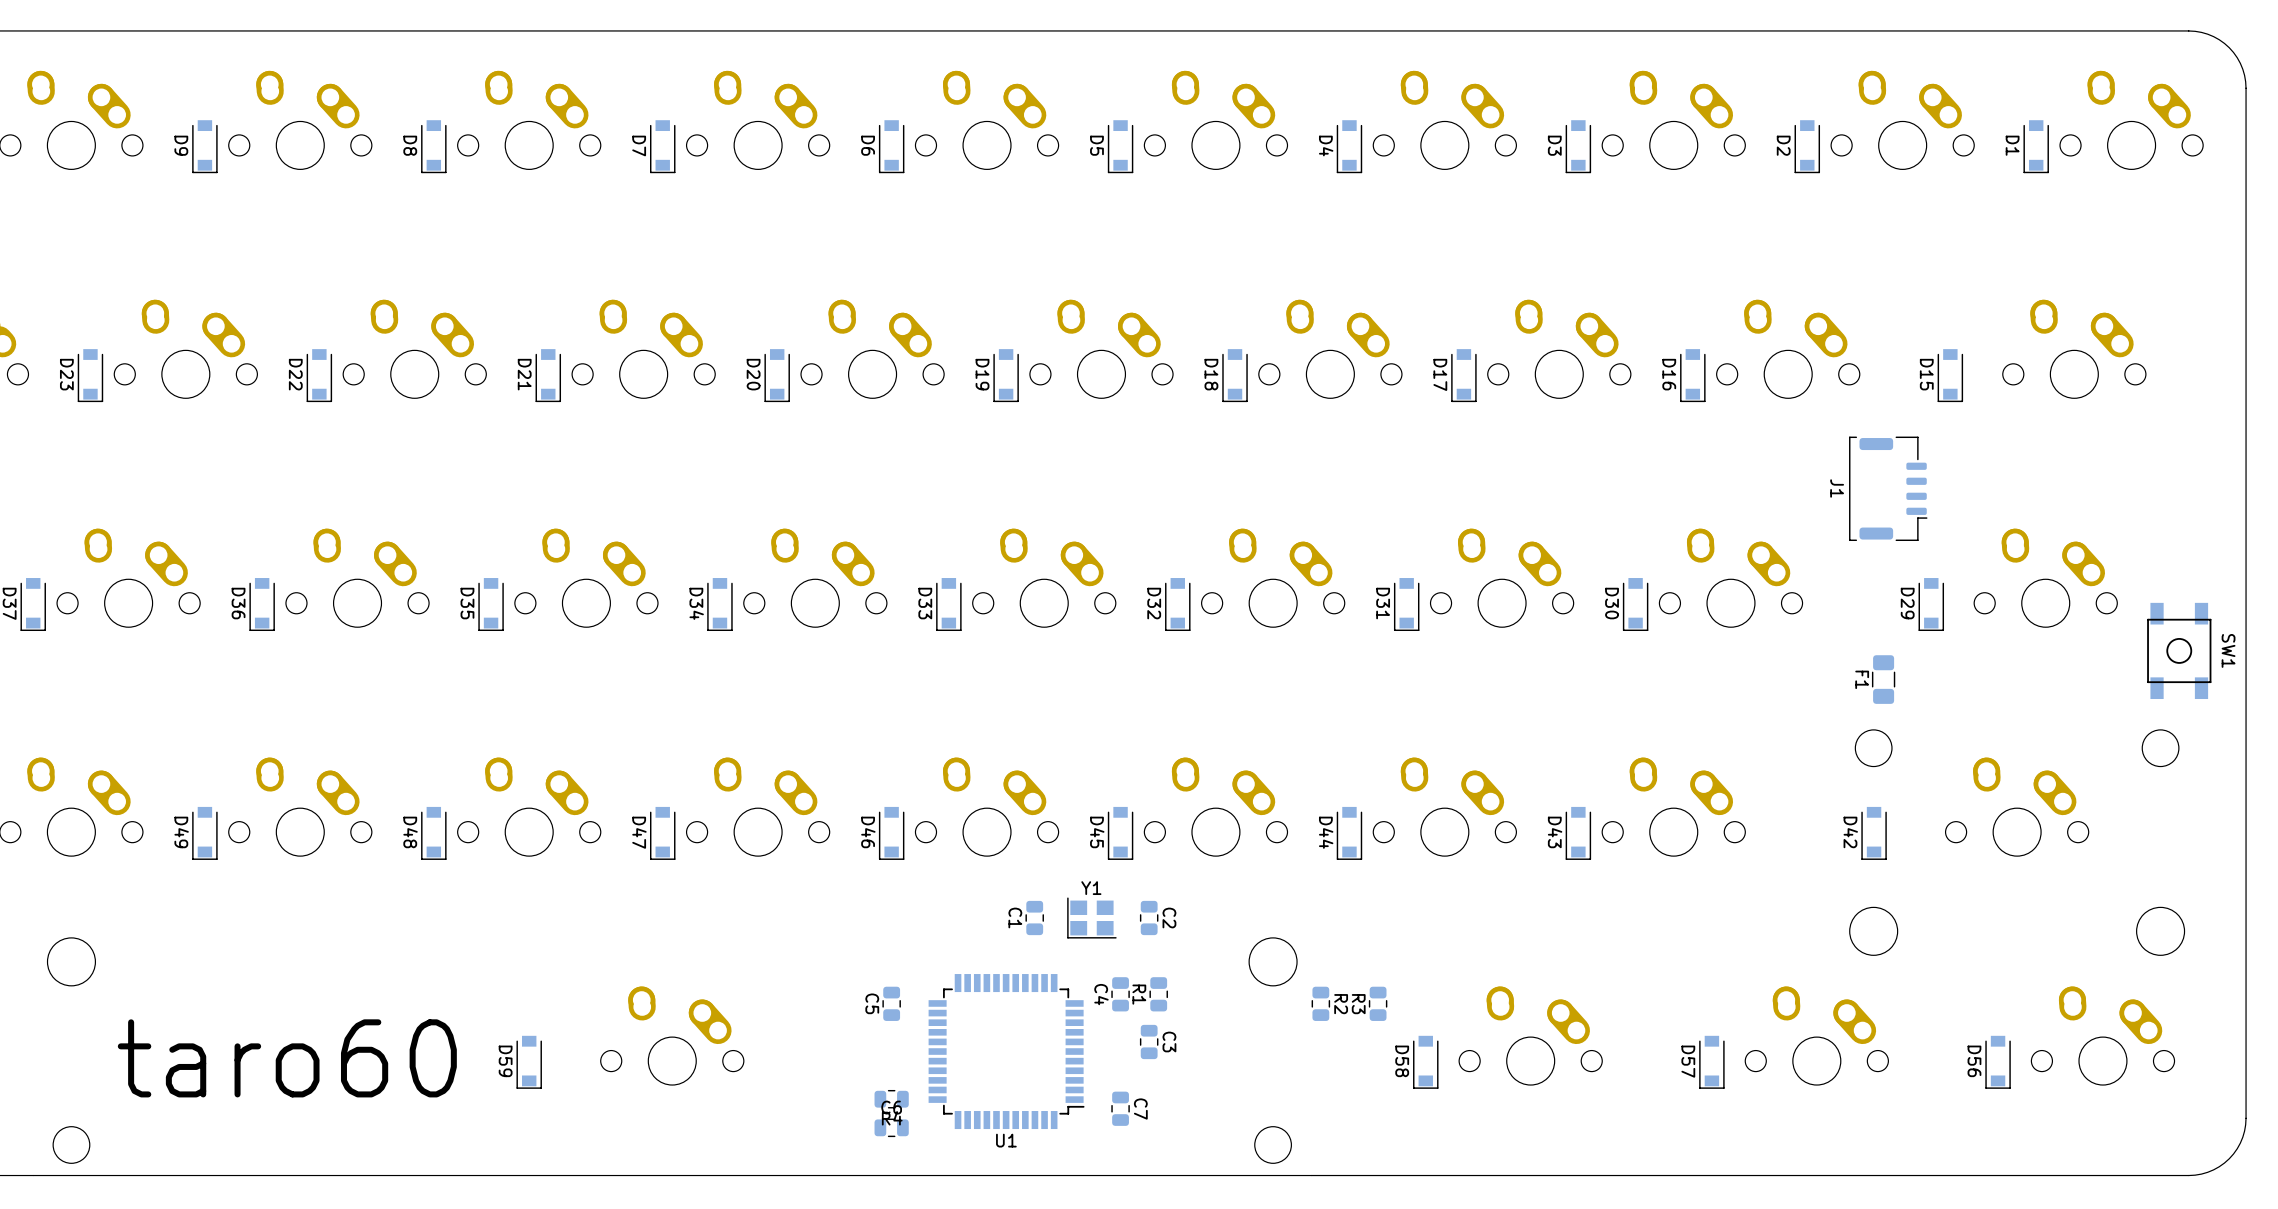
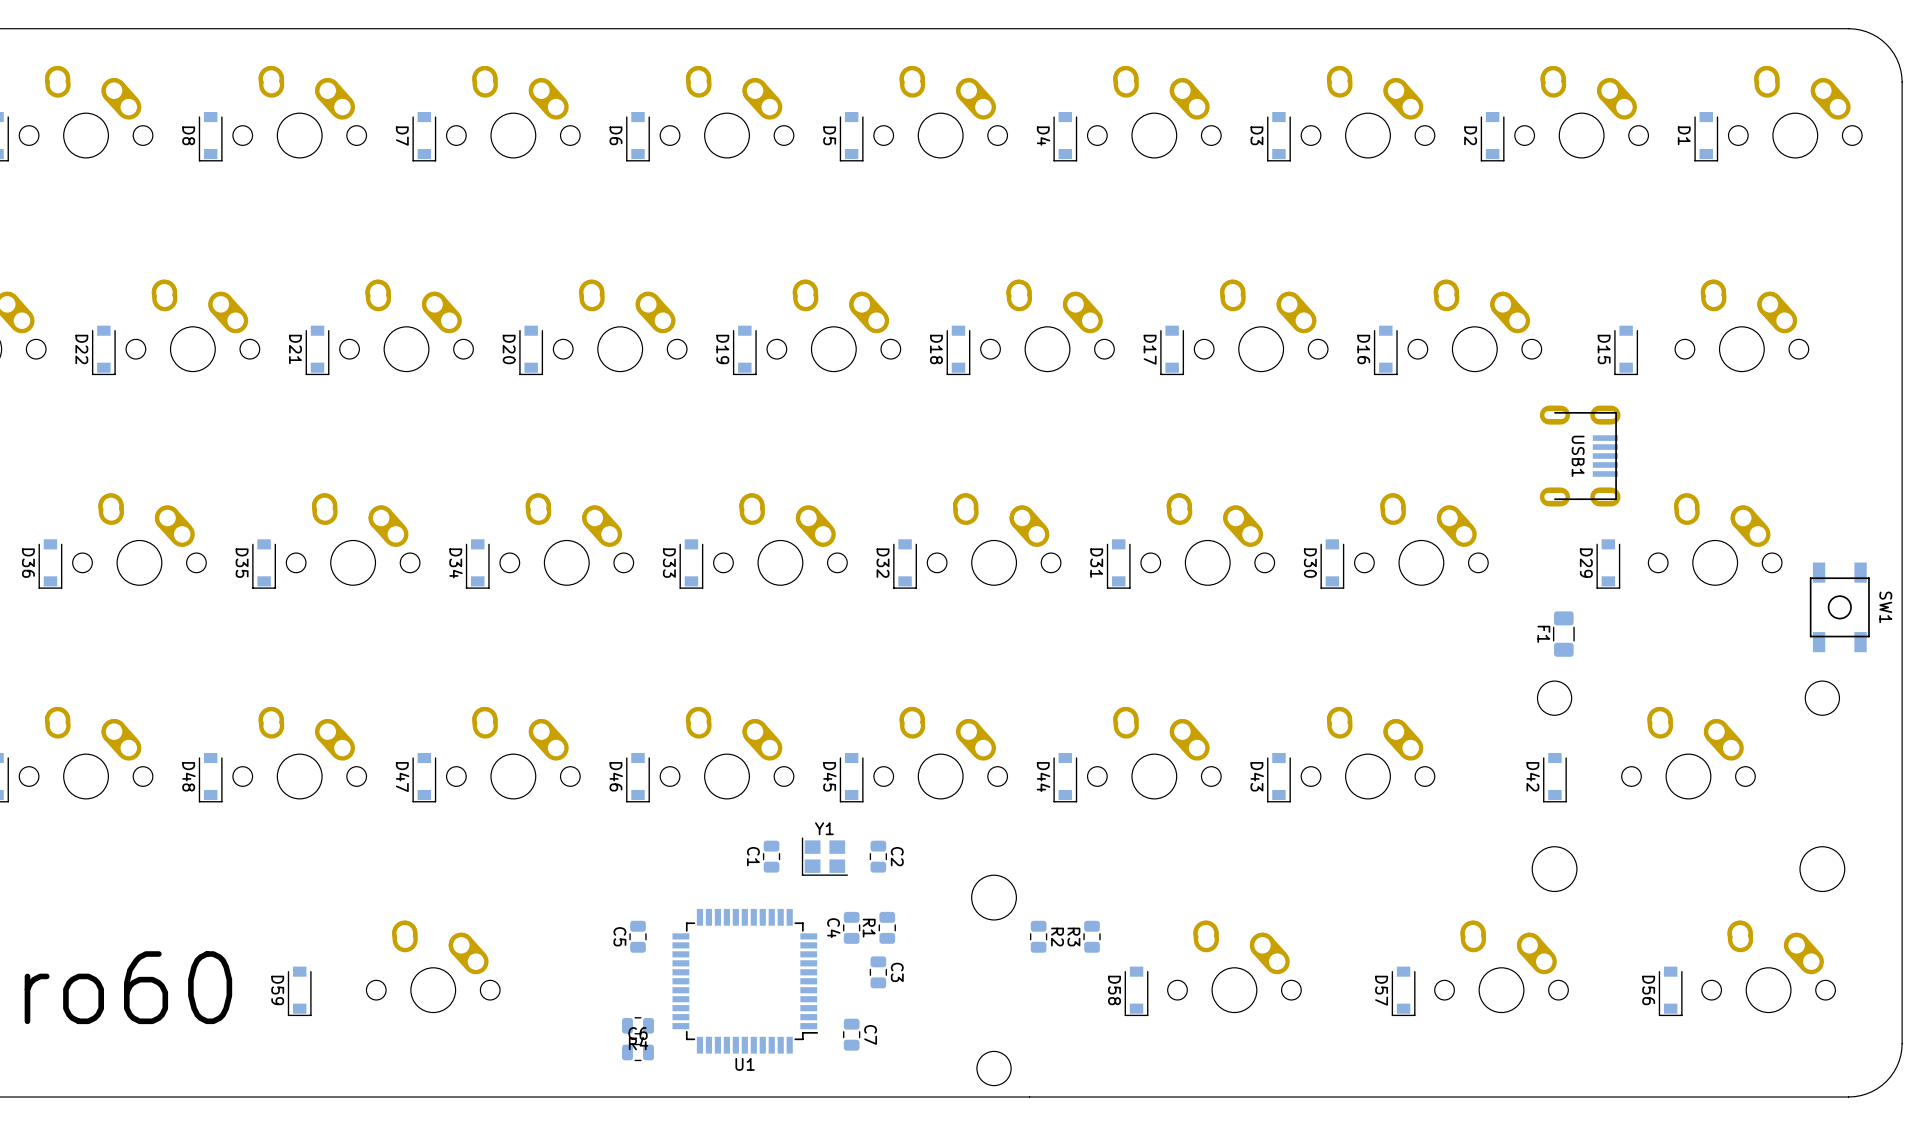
J1: (1888, 488) -> none
USB1: none -> (1580, 456)

